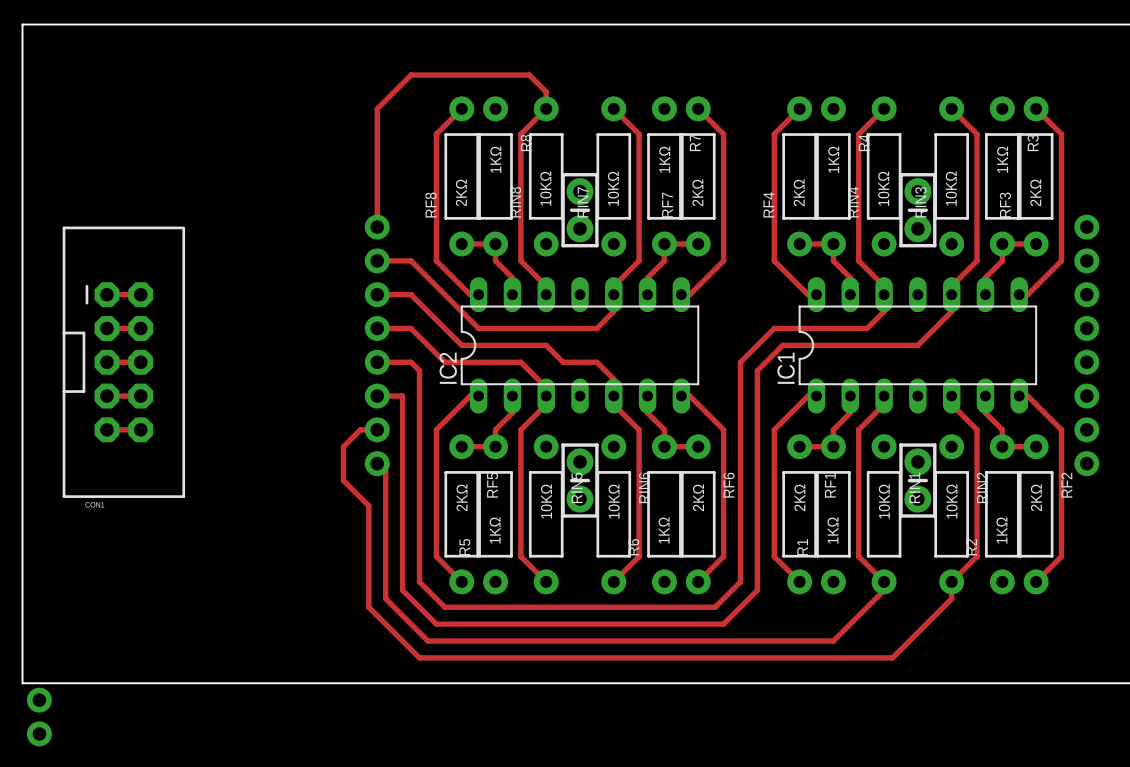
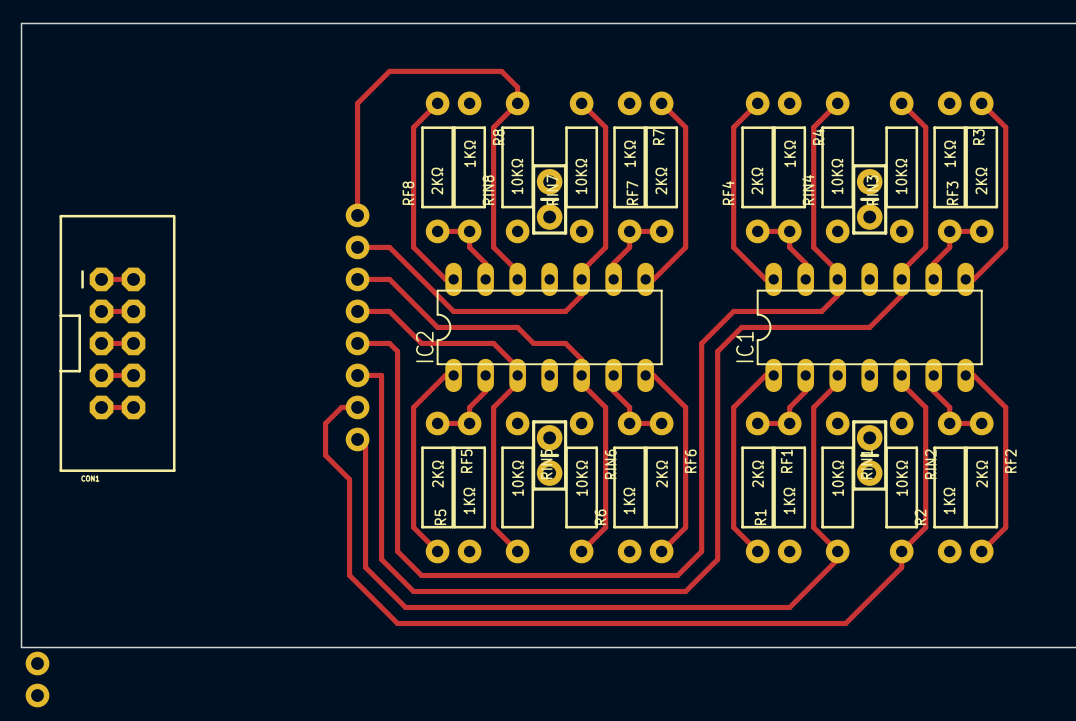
part: (1086, 227) -> none
part: (1086, 260) -> none
part: (1086, 294) -> none
part: (1086, 328) -> none
part: (1086, 362) -> none
part: (1086, 396) -> none
part: (1086, 429) -> none
part: (1086, 463) -> none

